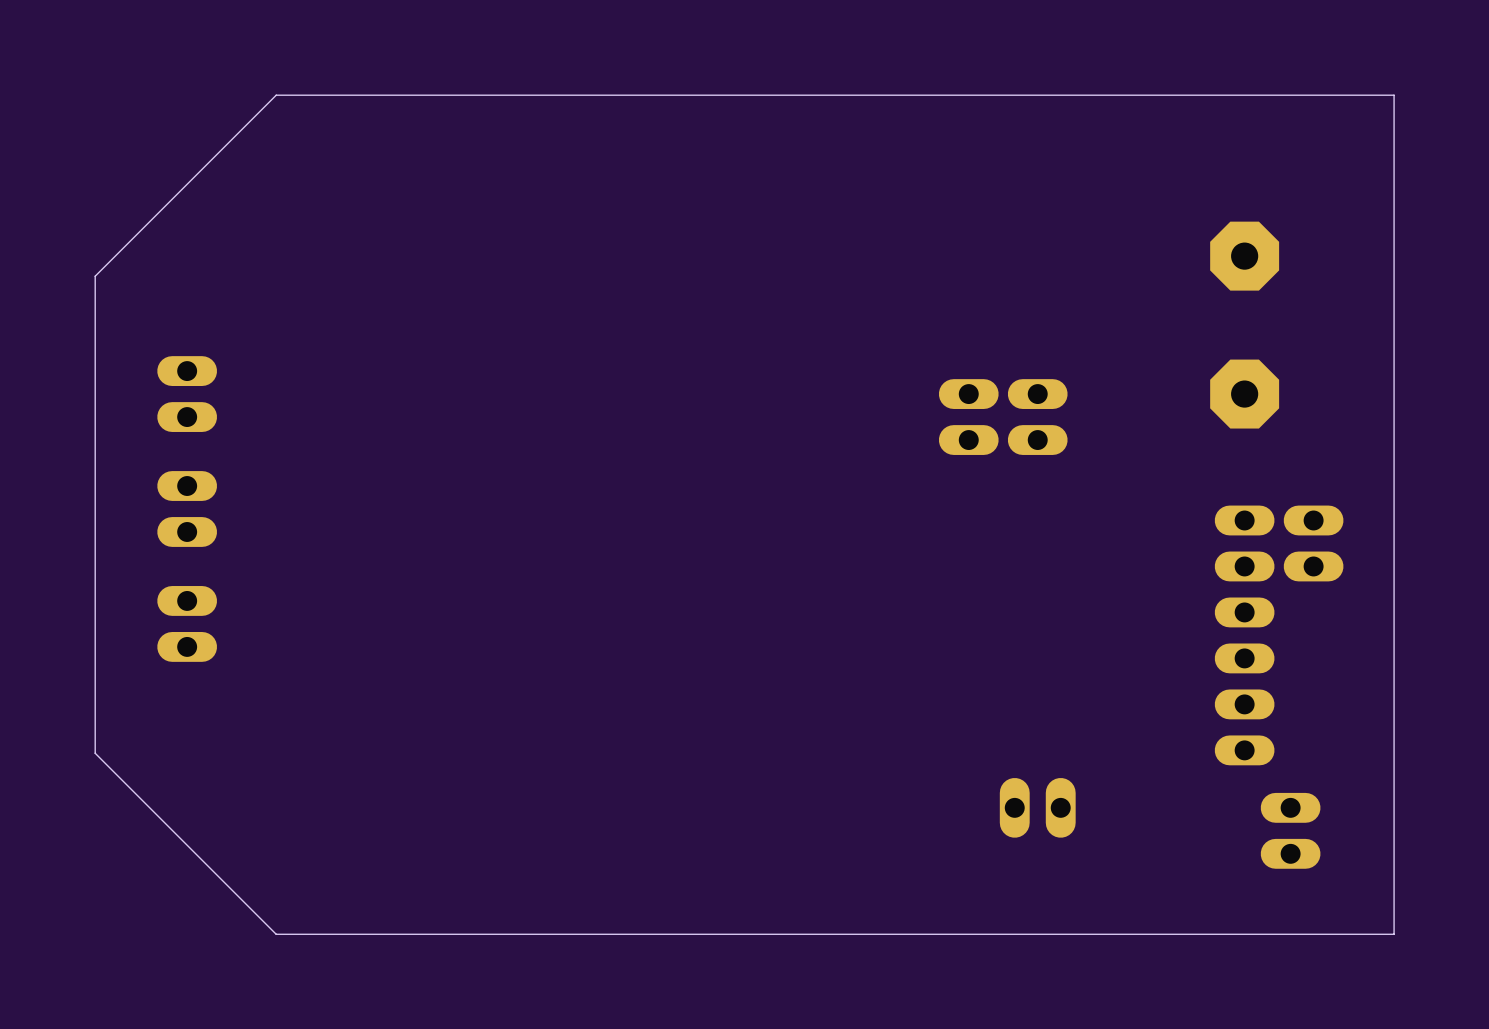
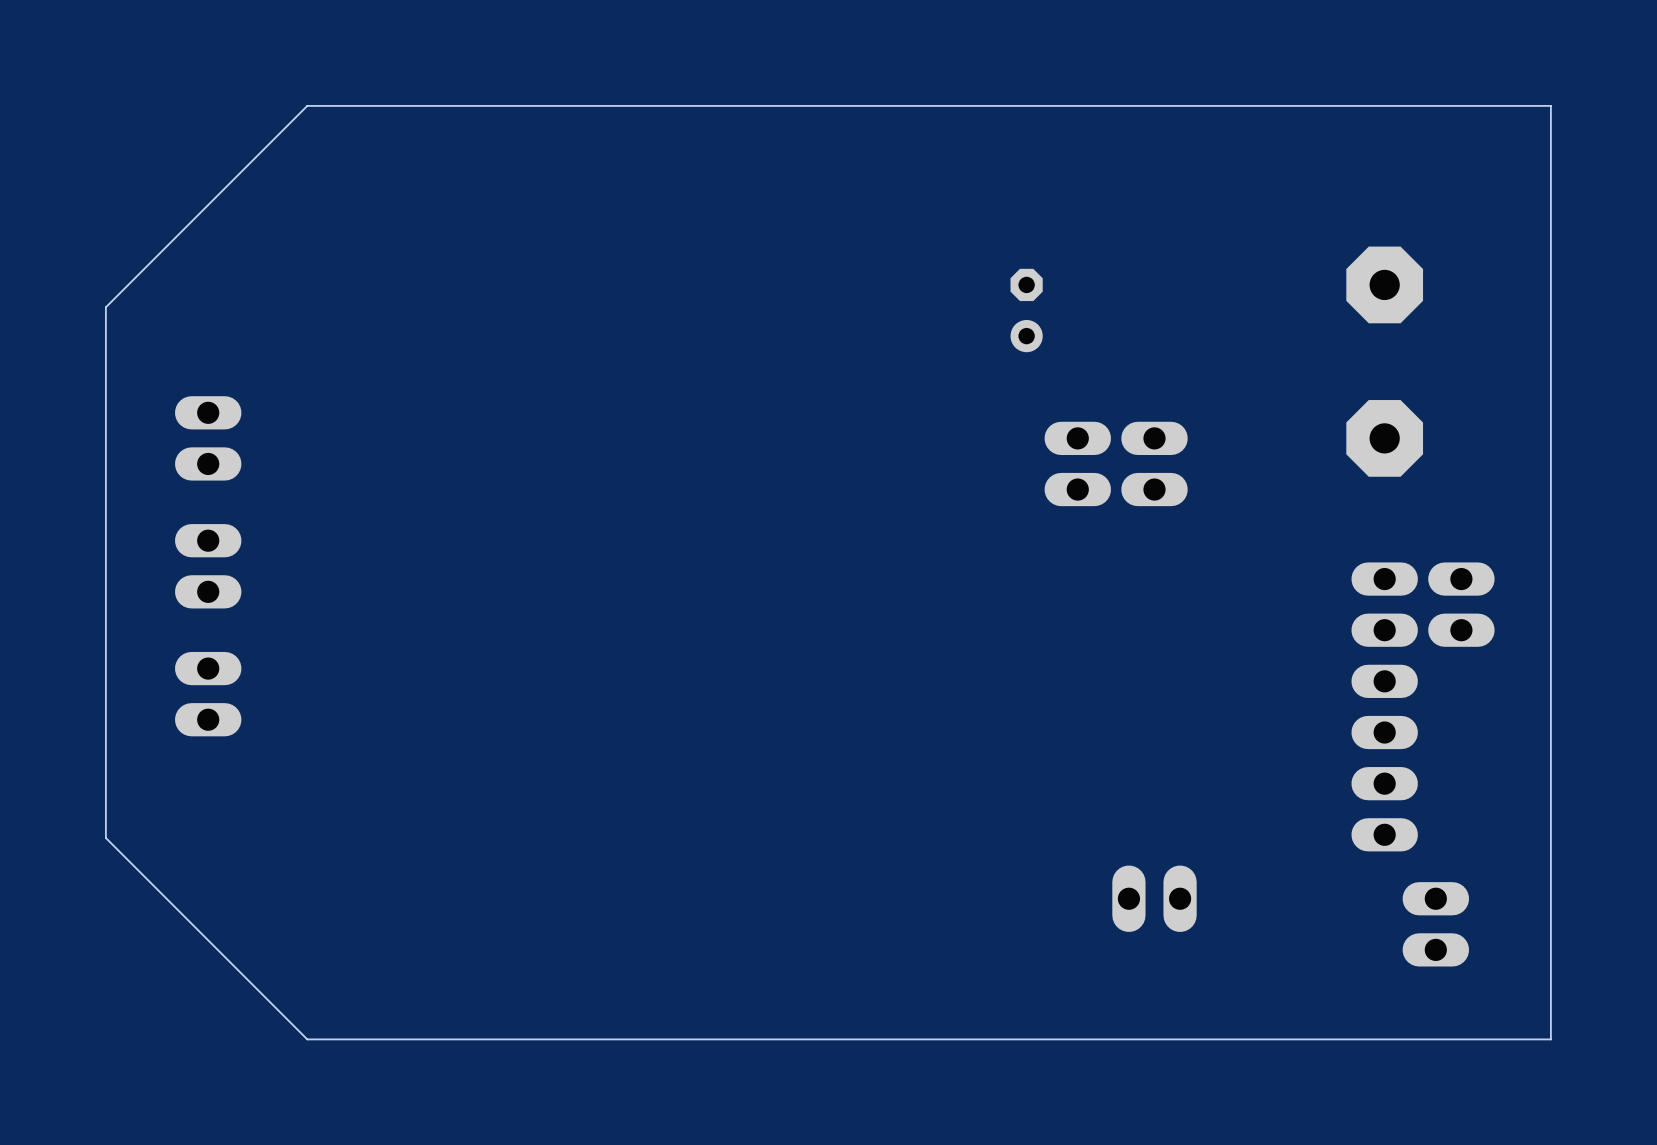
part: none -> (1026, 310)

